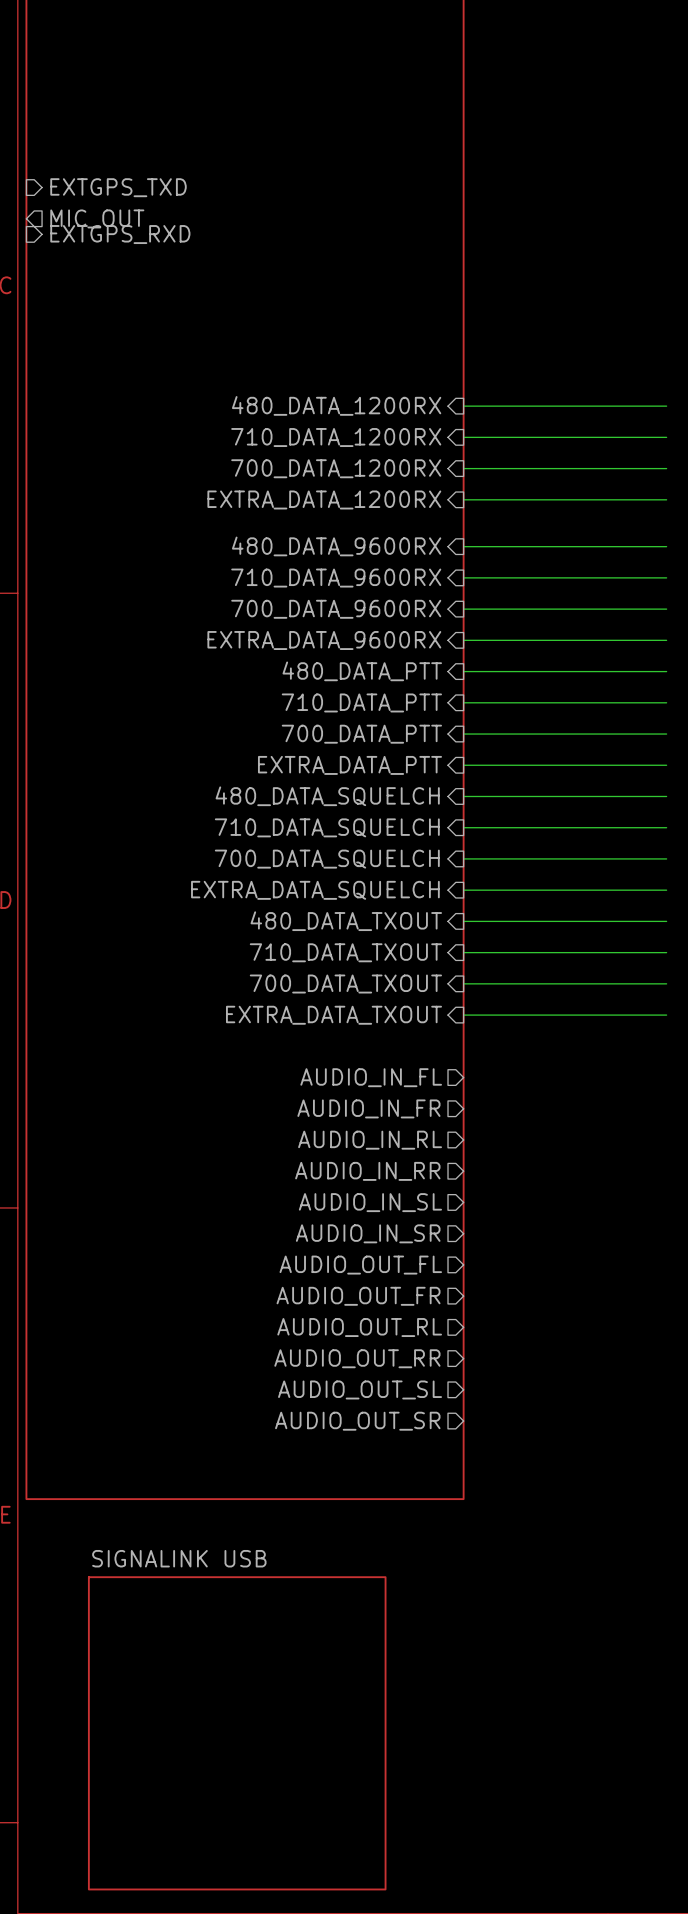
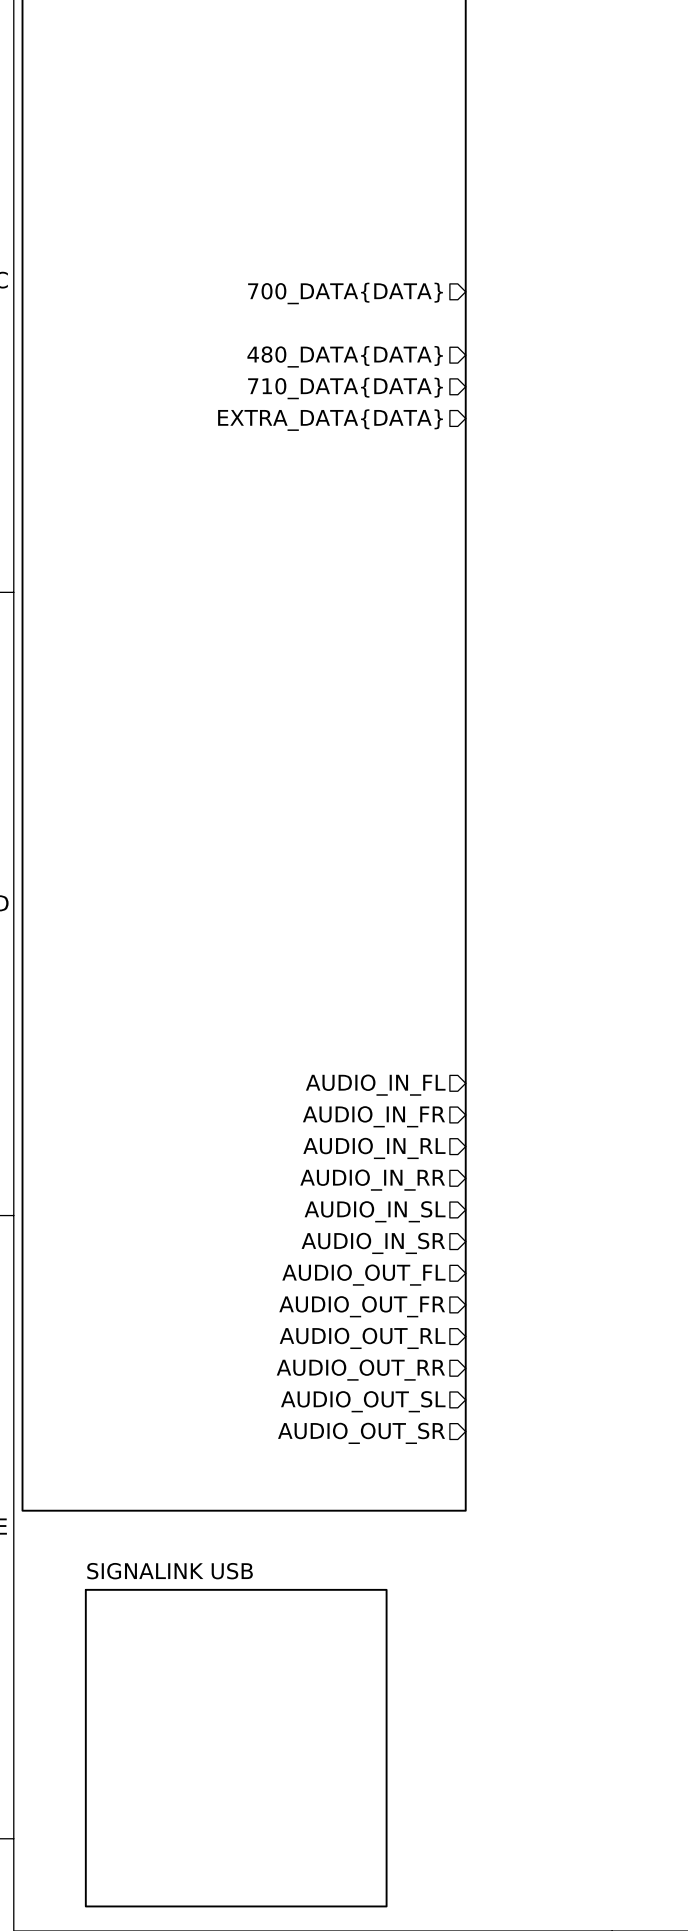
sheet pin: EXTGPS_TXD (118, 187) -> none
sheet pin: MIC_OUT (97, 218) -> none
sheet pin: EXTGPS_RXD (120, 234) -> none
sheet pin: none -> 700_DATA{DATA} (345, 293)
sheet pin: none -> 480_DATA{DATA} (345, 356)
sheet pin: none -> 710_DATA{DATA} (345, 388)
sheet pin: 480_DATA_1200RX (336, 405) -> none
wire: (463, 406) (666, 406) -> none
sheet pin: none -> EXTRA_DATA{DATA} (330, 420)
sheet pin: 710_DATA_1200RX (336, 437) -> none
wire: (463, 437) (666, 437) -> none
sheet pin: 700_DATA_1200RX (336, 468) -> none
wire: (463, 468) (666, 468) -> none
sheet pin: EXTRA_DATA_1200RX (324, 499) -> none
wire: (463, 499) (666, 499) -> none
sheet pin: 480_DATA_9600RX (336, 546) -> none
wire: (463, 546) (666, 546) -> none
wire: (463, 577) (666, 577) -> none
sheet pin: 710_DATA_9600RX (336, 578) -> none
sheet pin: 700_DATA_9600RX (336, 609) -> none
wire: (463, 609) (666, 609) -> none
sheet pin: EXTRA_DATA_9600RX (324, 640) -> none
wire: (463, 640) (666, 640) -> none
sheet pin: 480_DATA_PTT (362, 671) -> none
wire: (463, 671) (666, 671) -> none
sheet pin: 710_DATA_PTT (361, 702) -> none
wire: (463, 702) (666, 702) -> none
sheet pin: 700_DATA_PTT (361, 734) -> none
wire: (463, 734) (666, 734) -> none
sheet pin: EXTRA_DATA_PTT (349, 765) -> none
wire: (463, 765) (666, 765) -> none
sheet pin: 480_DATA_SQUELCH (327, 796) -> none
wire: (463, 796) (666, 796) -> none
sheet pin: 710_DATA_SQUELCH (327, 827) -> none
wire: (463, 827) (666, 827) -> none
wire: (463, 858) (666, 858) -> none
sheet pin: 700_DATA_SQUELCH (327, 859) -> none
sheet pin: EXTRA_DATA_SQUELCH (315, 890) -> none
wire: (463, 890) (666, 890) -> none
sheet pin: 480_DATA_TXOUT (346, 921) -> none
wire: (463, 921) (666, 921) -> none
sheet pin: 710_DATA_TXOUT (345, 952) -> none
wire: (463, 952) (666, 952) -> none
wire: (463, 983) (666, 983) -> none
sheet pin: 700_DATA_TXOUT (345, 984) -> none
sheet pin: EXTRA_DATA_TXOUT (334, 1015) -> none
wire: (463, 1015) (666, 1015) -> none

